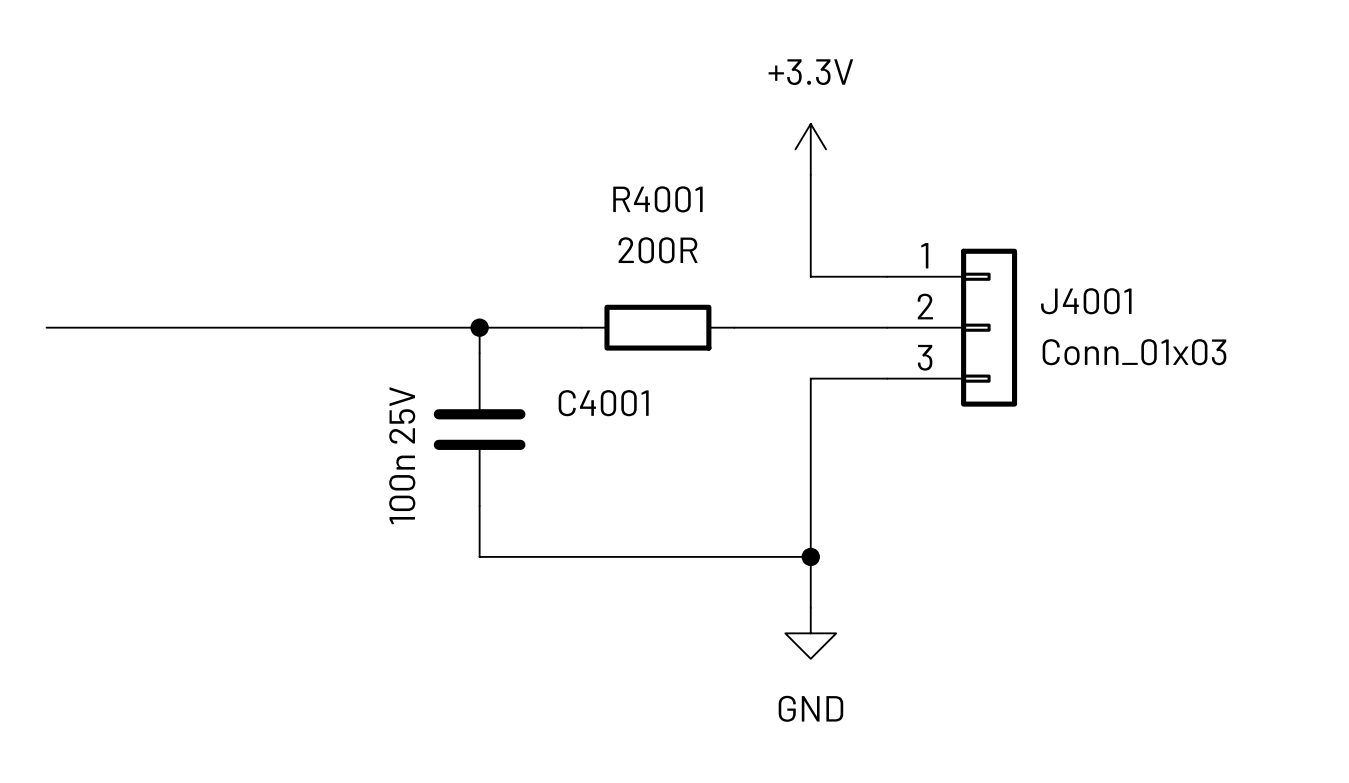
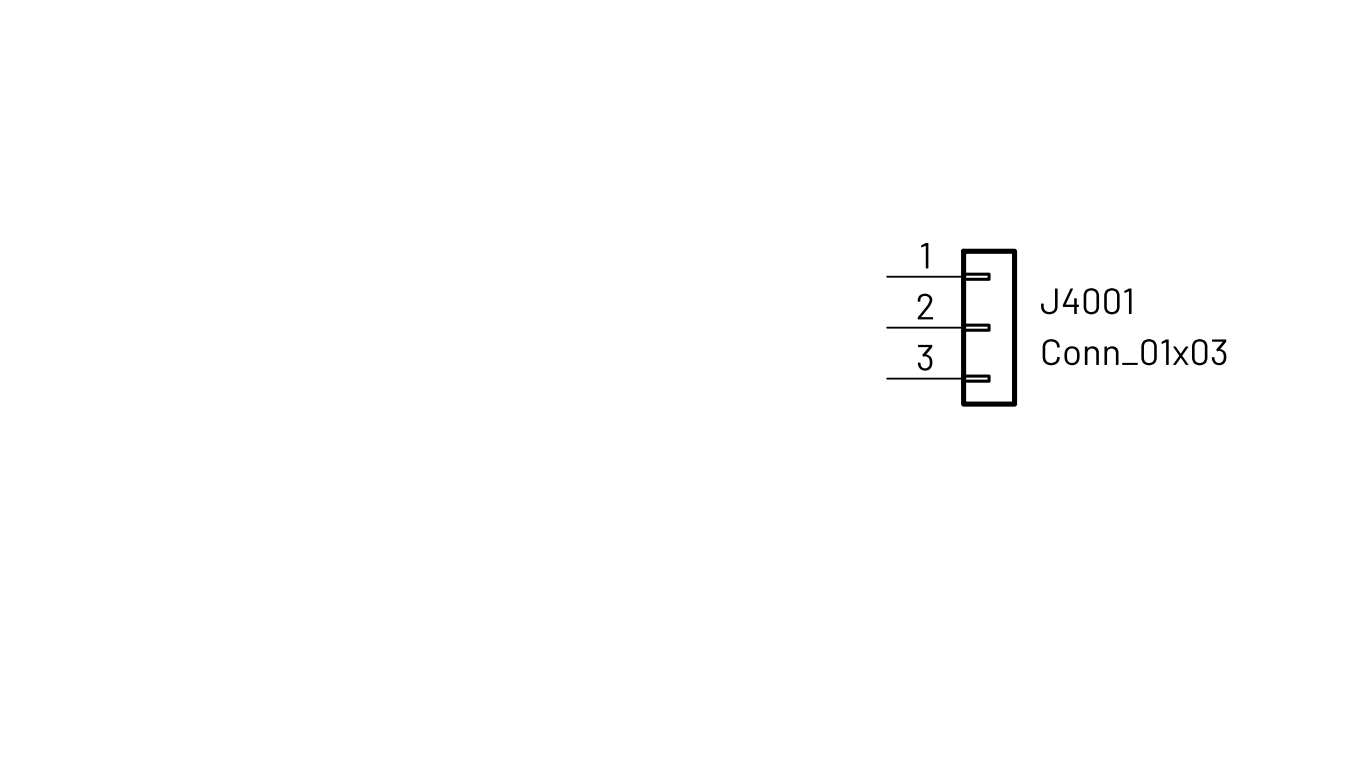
power symbol: +3.3V (810, 149) -> none
wire: (810, 174) (810, 276) (887, 276) -> none
wire: (46, 327) (581, 327) -> none
wire: (479, 327) (479, 353) -> none
junction: (479, 327) -> none
R4001: 200R (657, 327) -> none
wire: (734, 327) (887, 327) -> none
wire: (887, 378) (810, 378) (810, 607) -> none
C4001: 100n 25V (479, 429) -> none
wire: (479, 505) (479, 556) (810, 556) -> none
junction: (810, 556) -> none
power symbol: GND (810, 633) -> none

